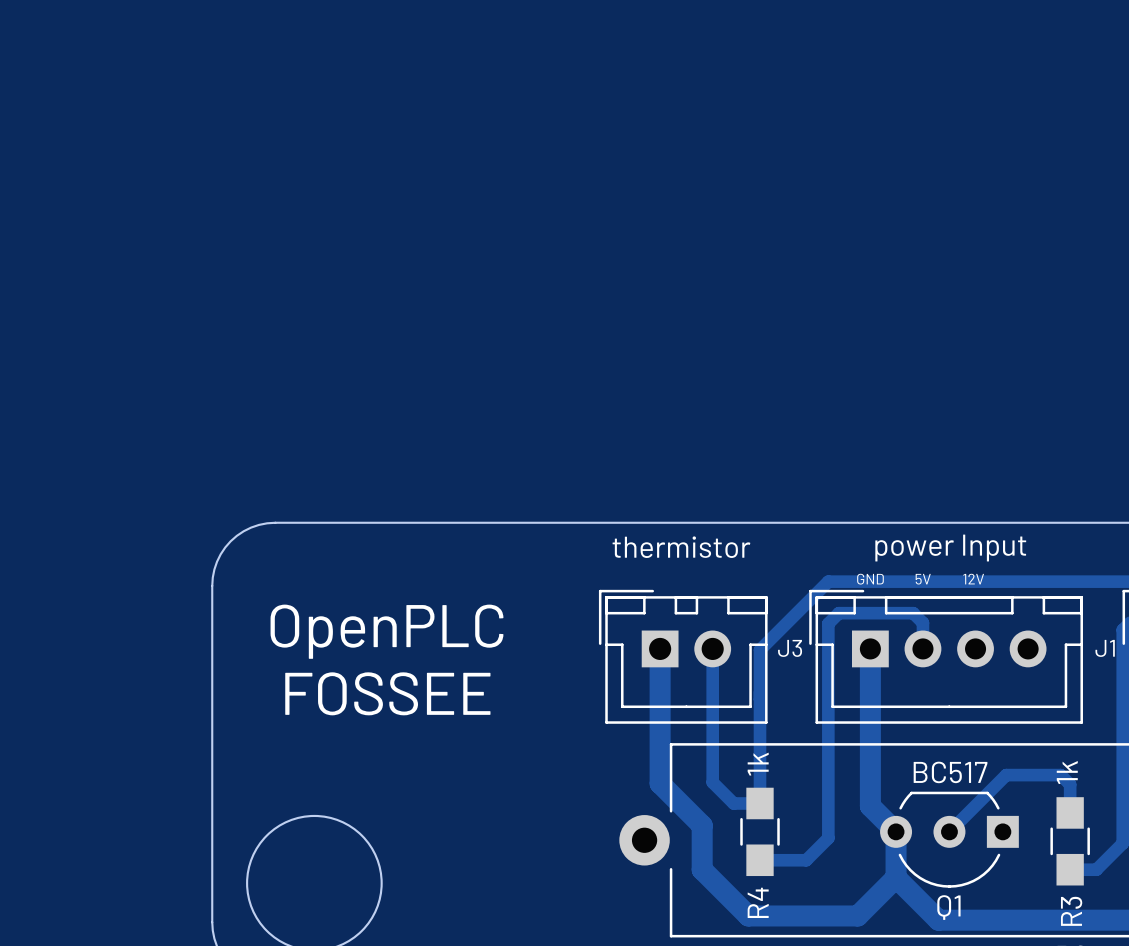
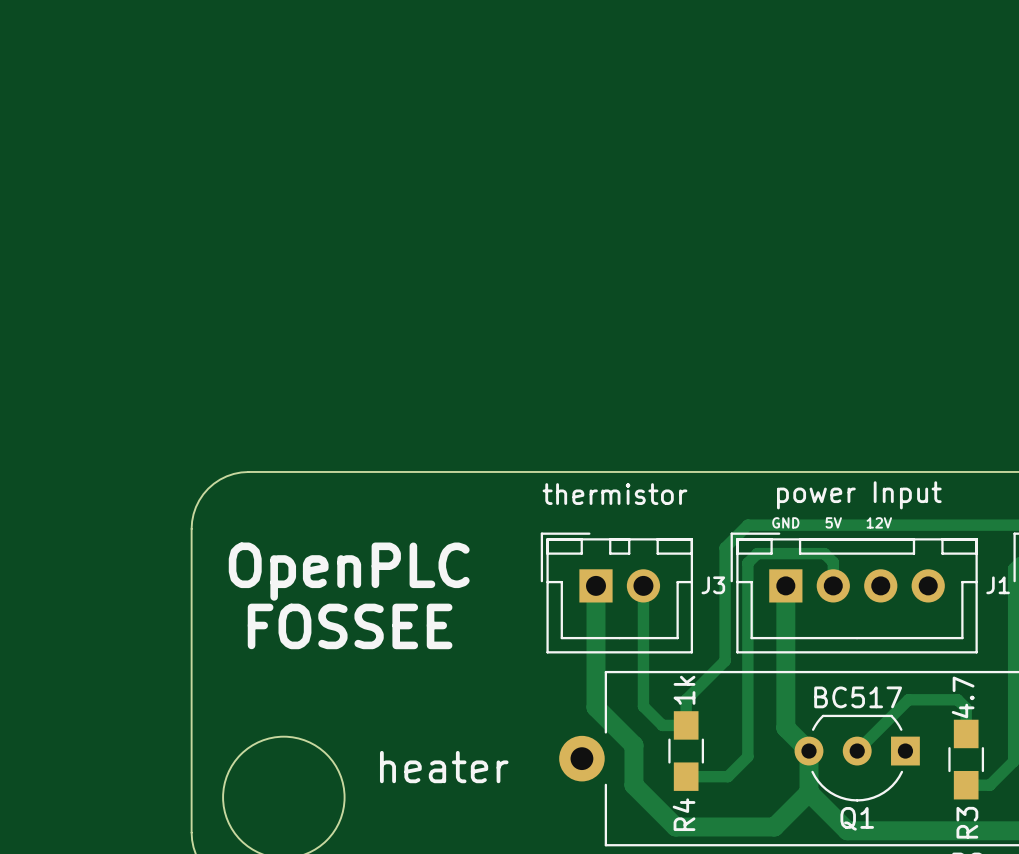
track: (803, 606) (760, 649) (760, 775) -> (725, 547) (725, 660) (686, 699)
R3 value: 1k (1067, 772) -> 4.7 (963, 697)
text: none -> heater (444, 767)

